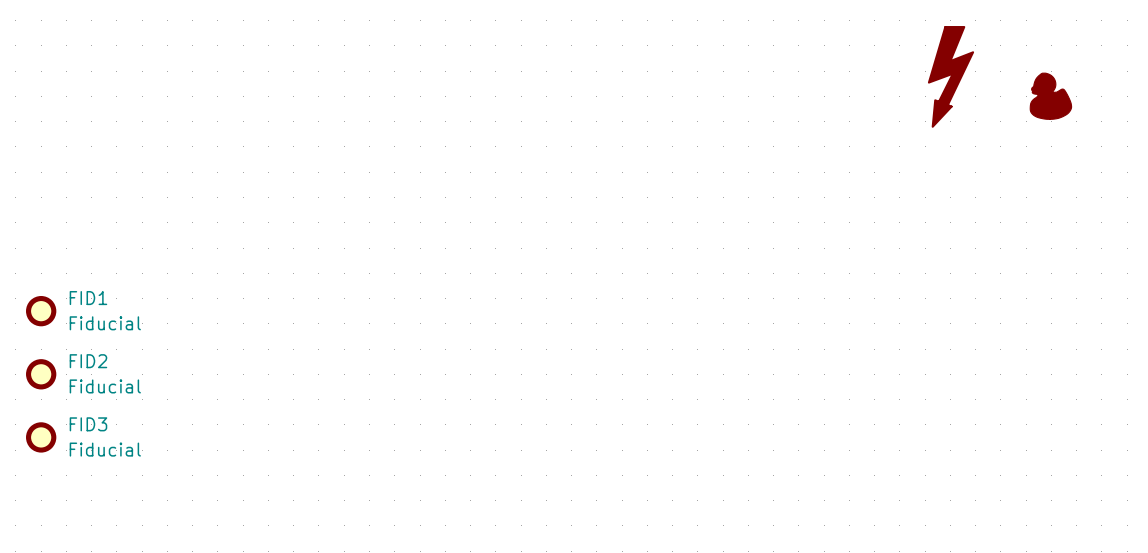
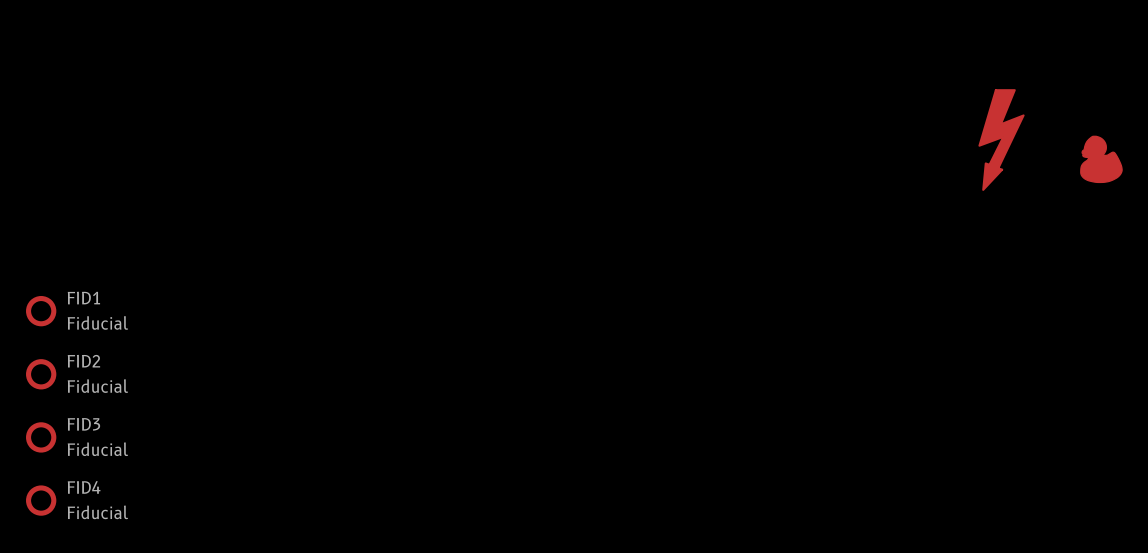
power symbol position: (951, 76) -> (1001, 140)
power symbol position: (1050, 96) -> (1101, 159)
FID4: none -> Fiducial (41, 500)

